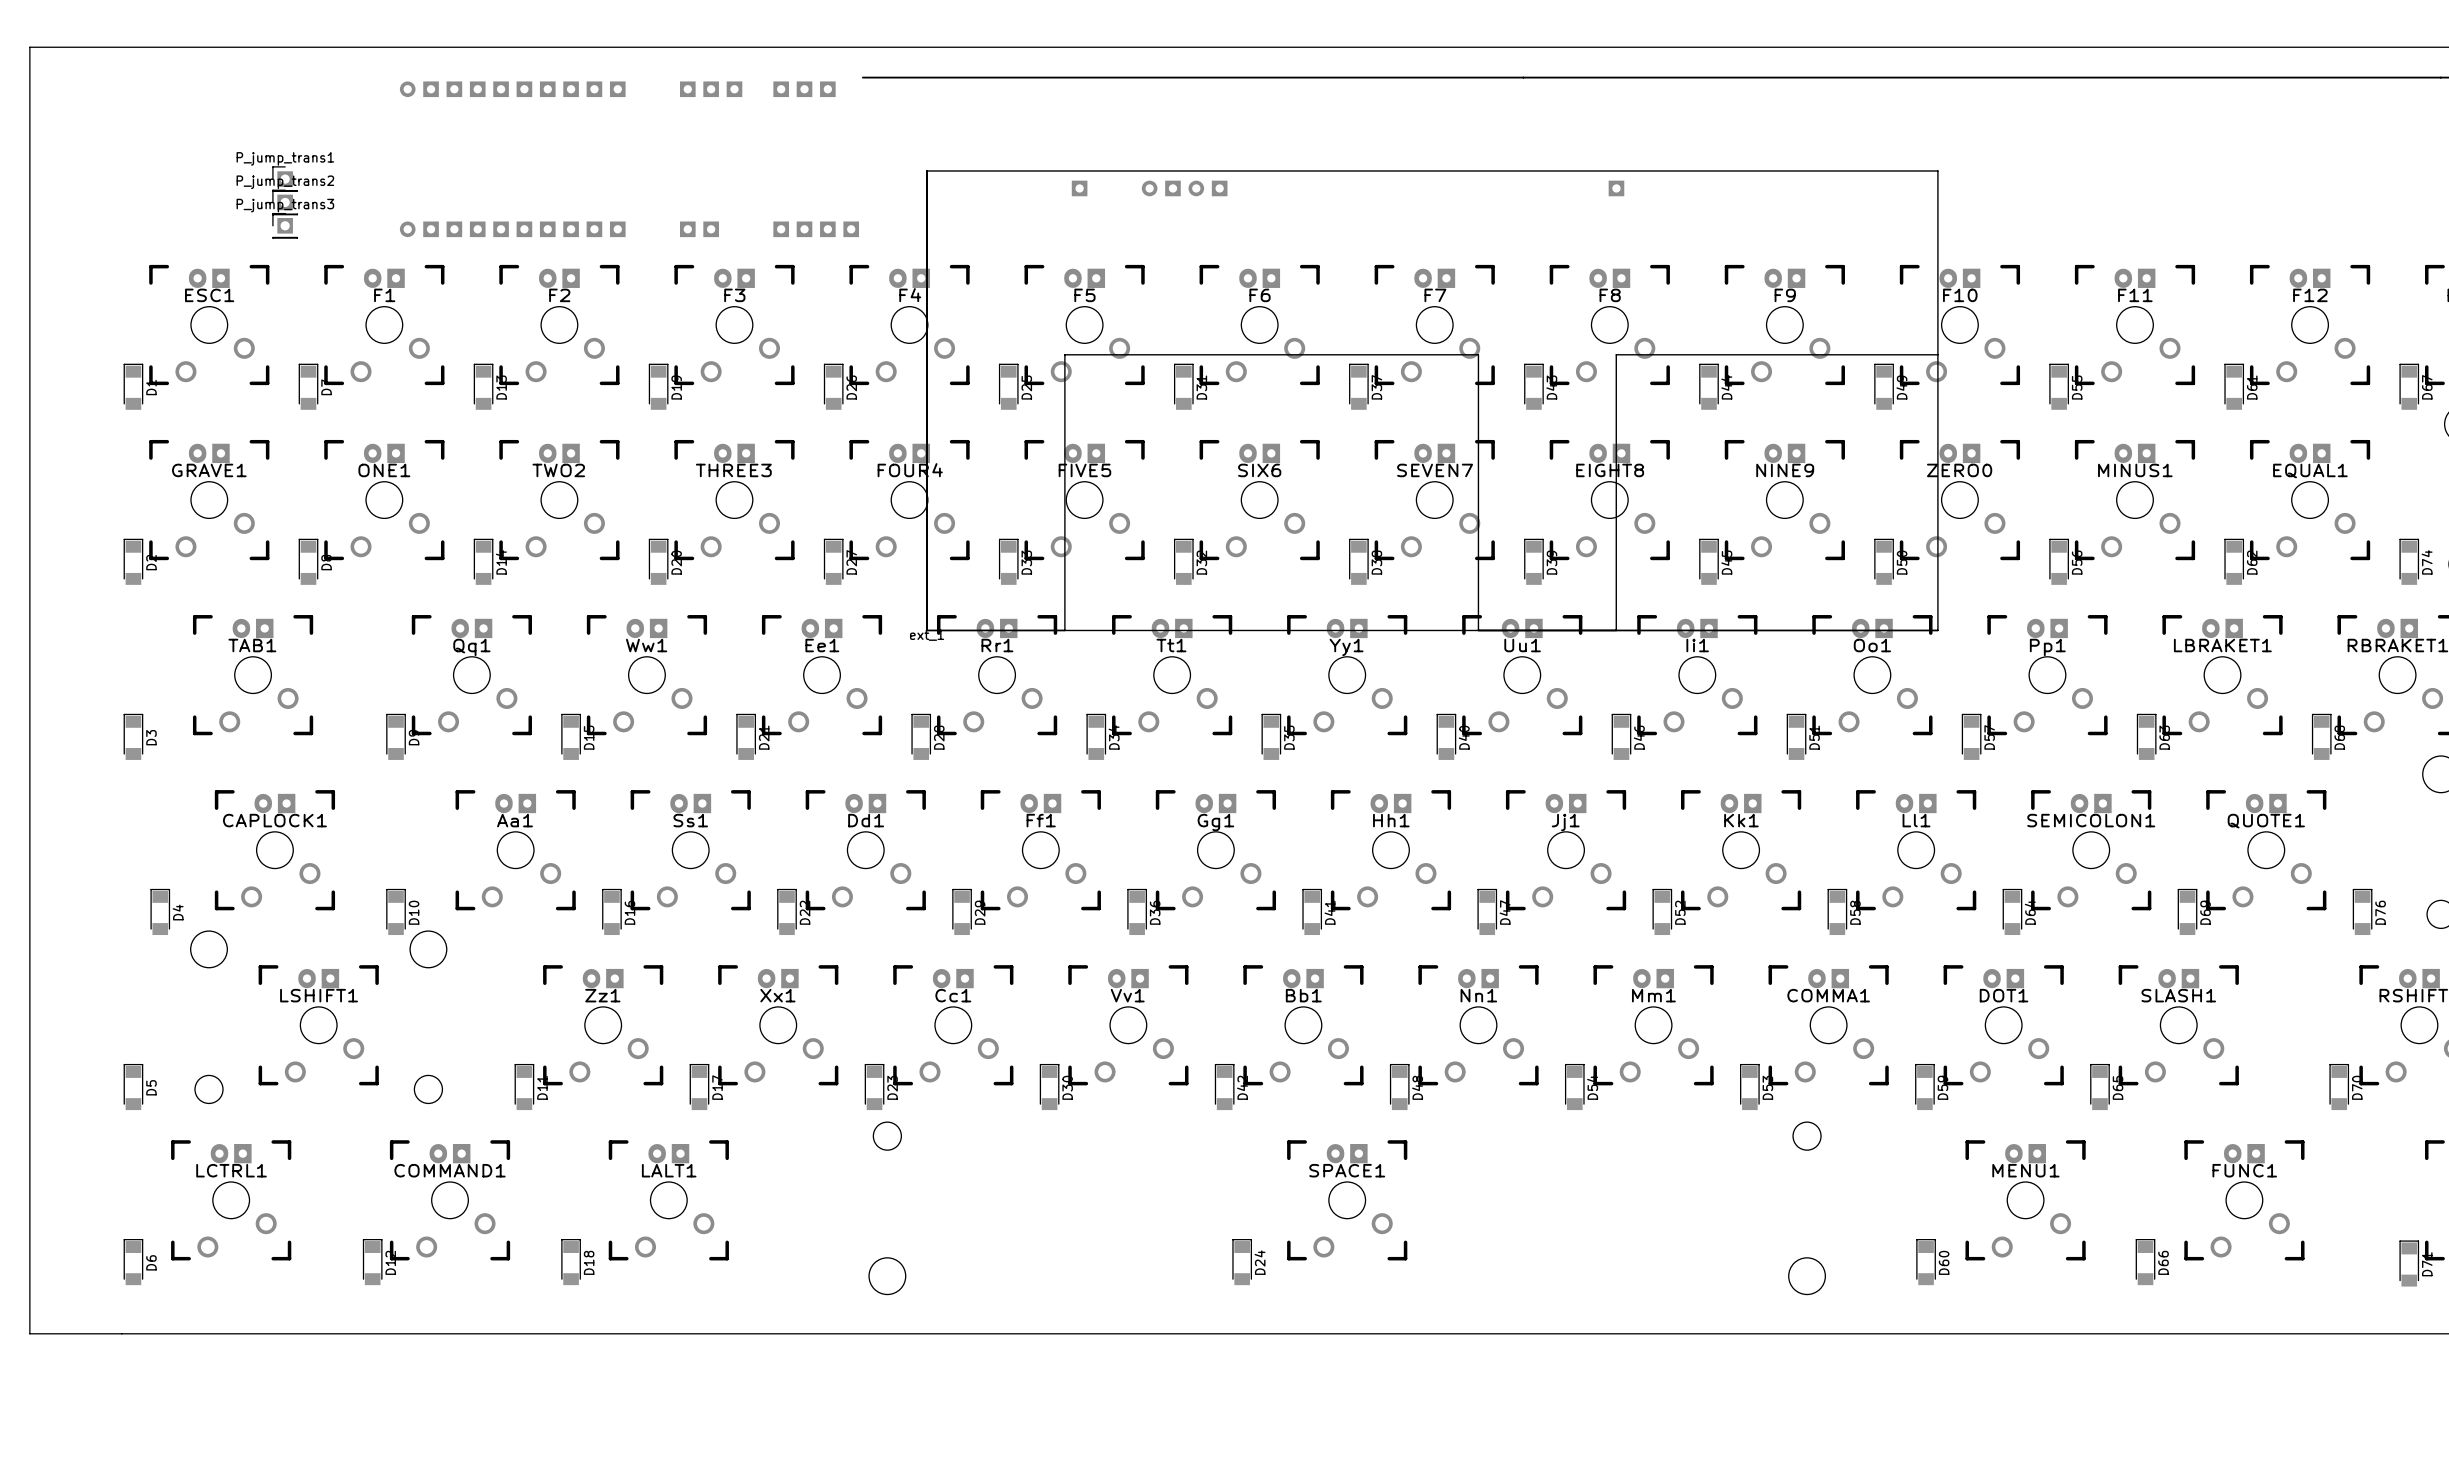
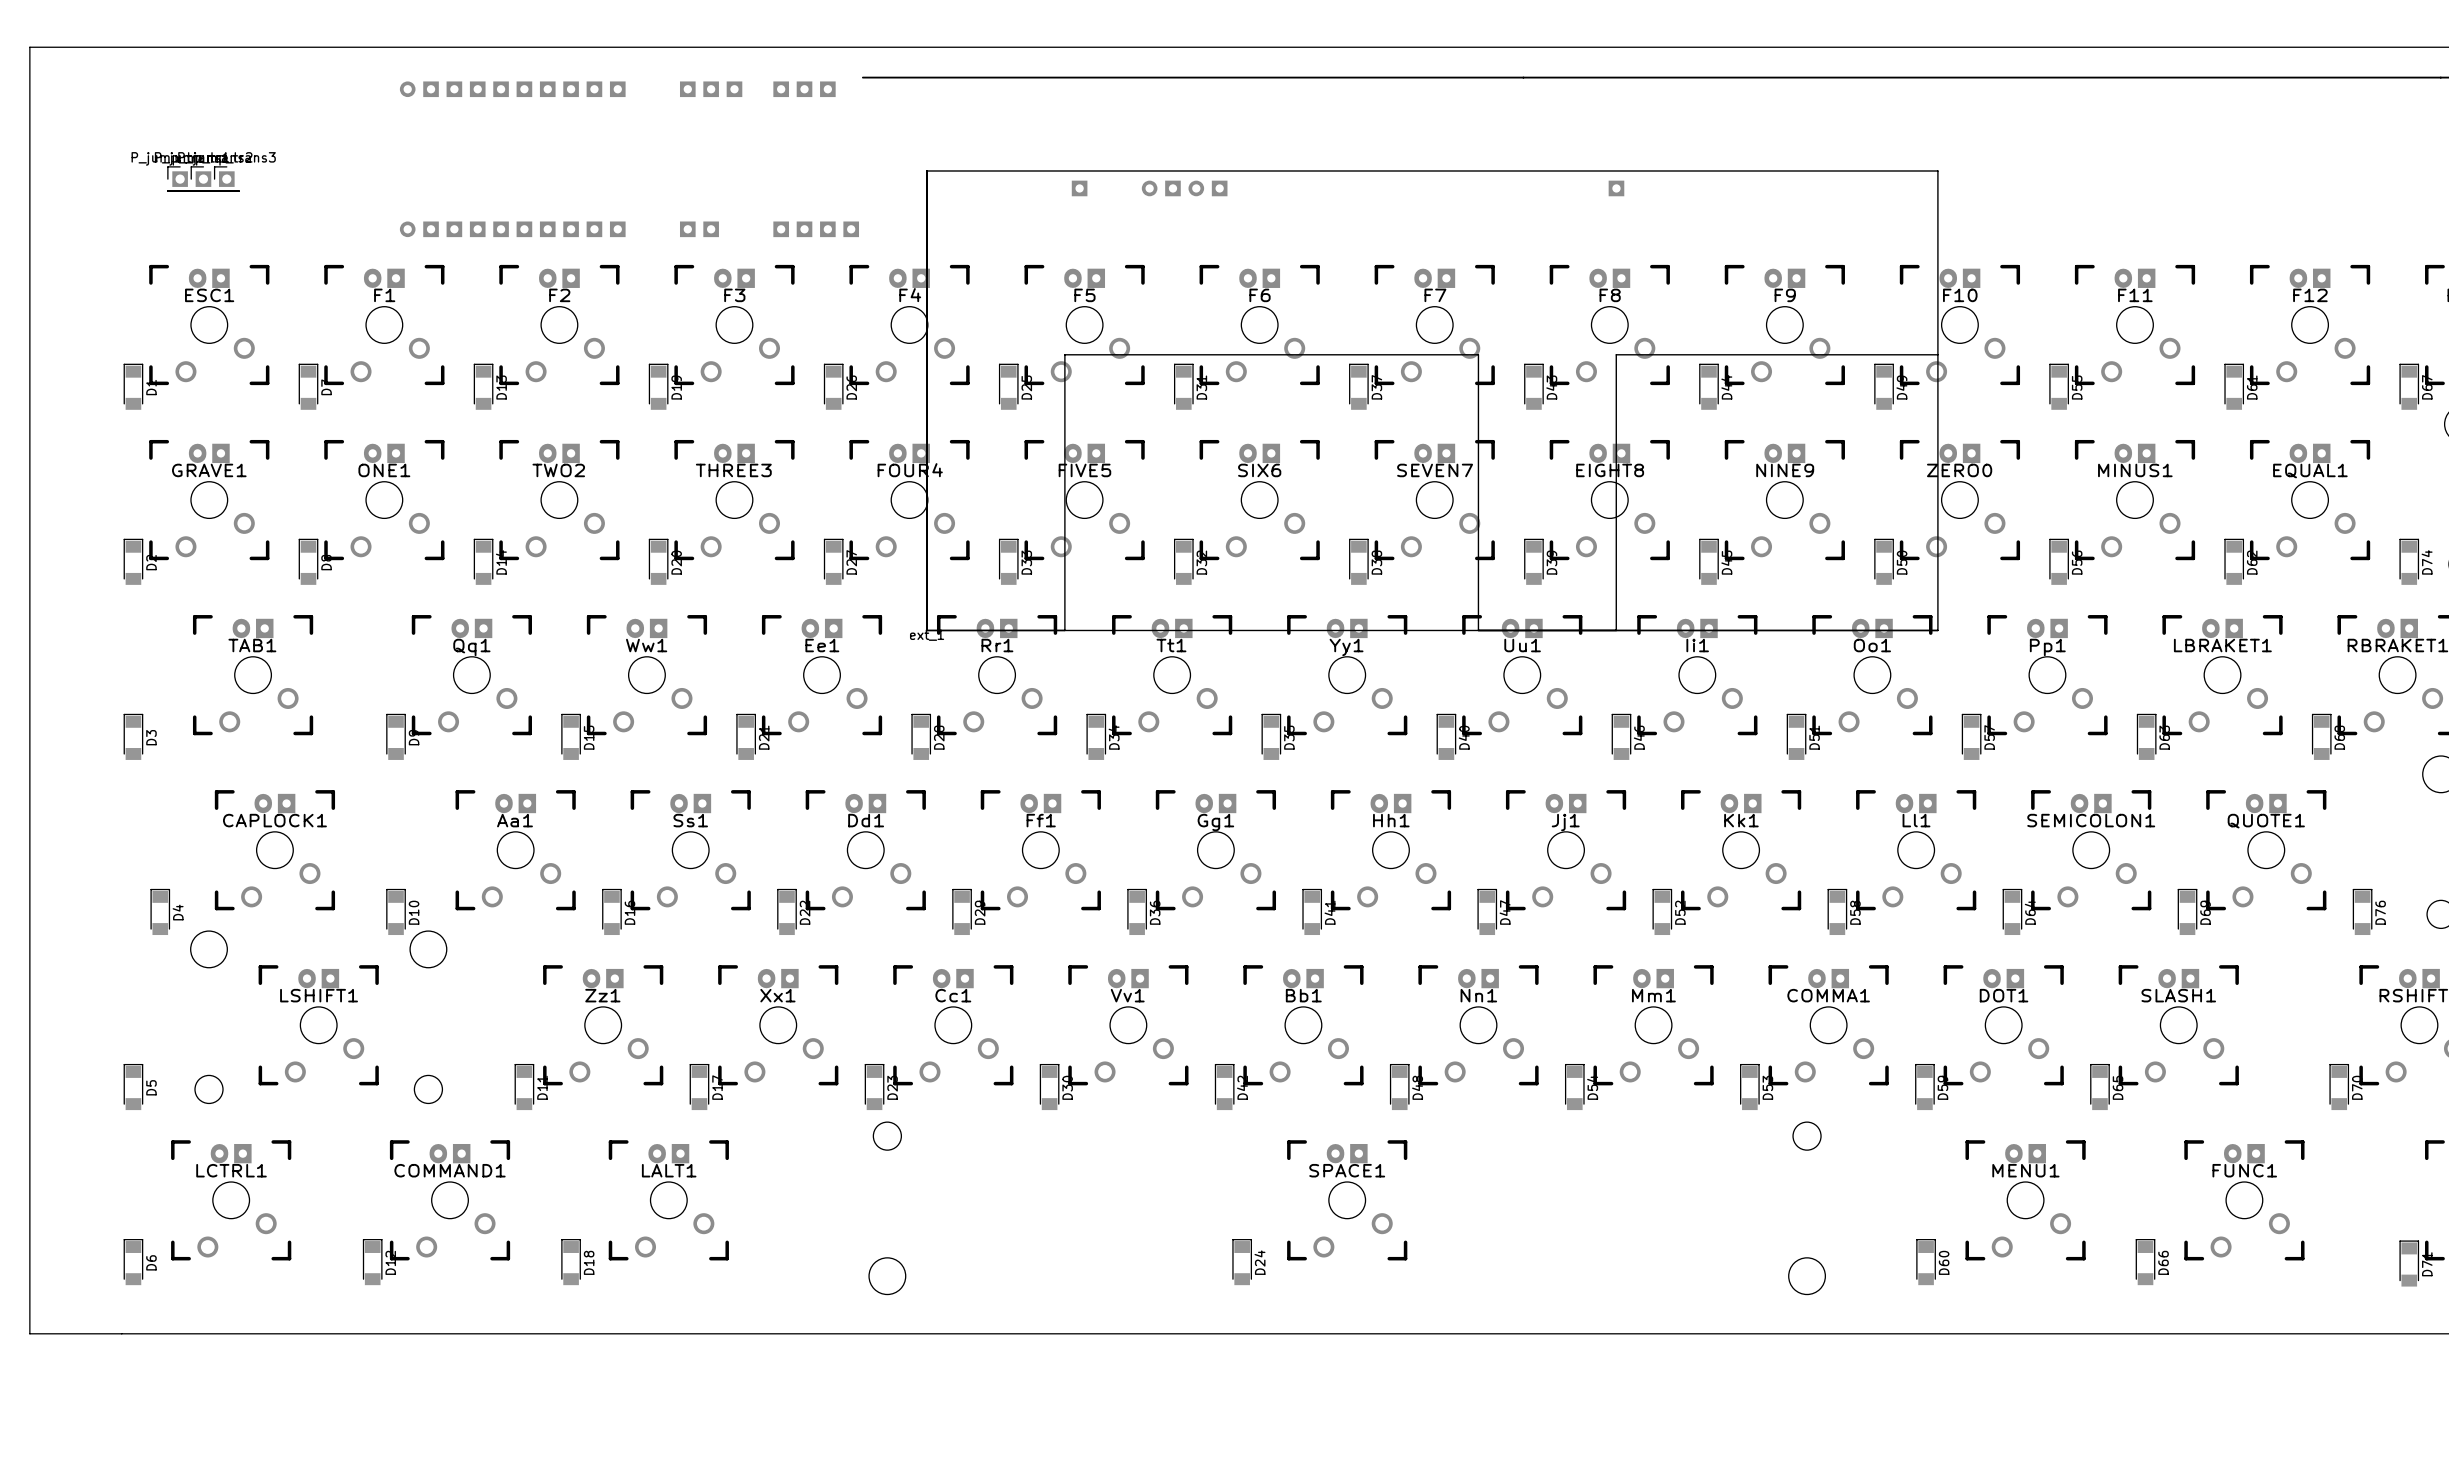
P_jump_trans1 position: (285, 179) -> (180, 179)
P_jump_trans2 position: (285, 202) -> (203, 179)
P_jump_trans3 position: (285, 225) -> (226, 179)

